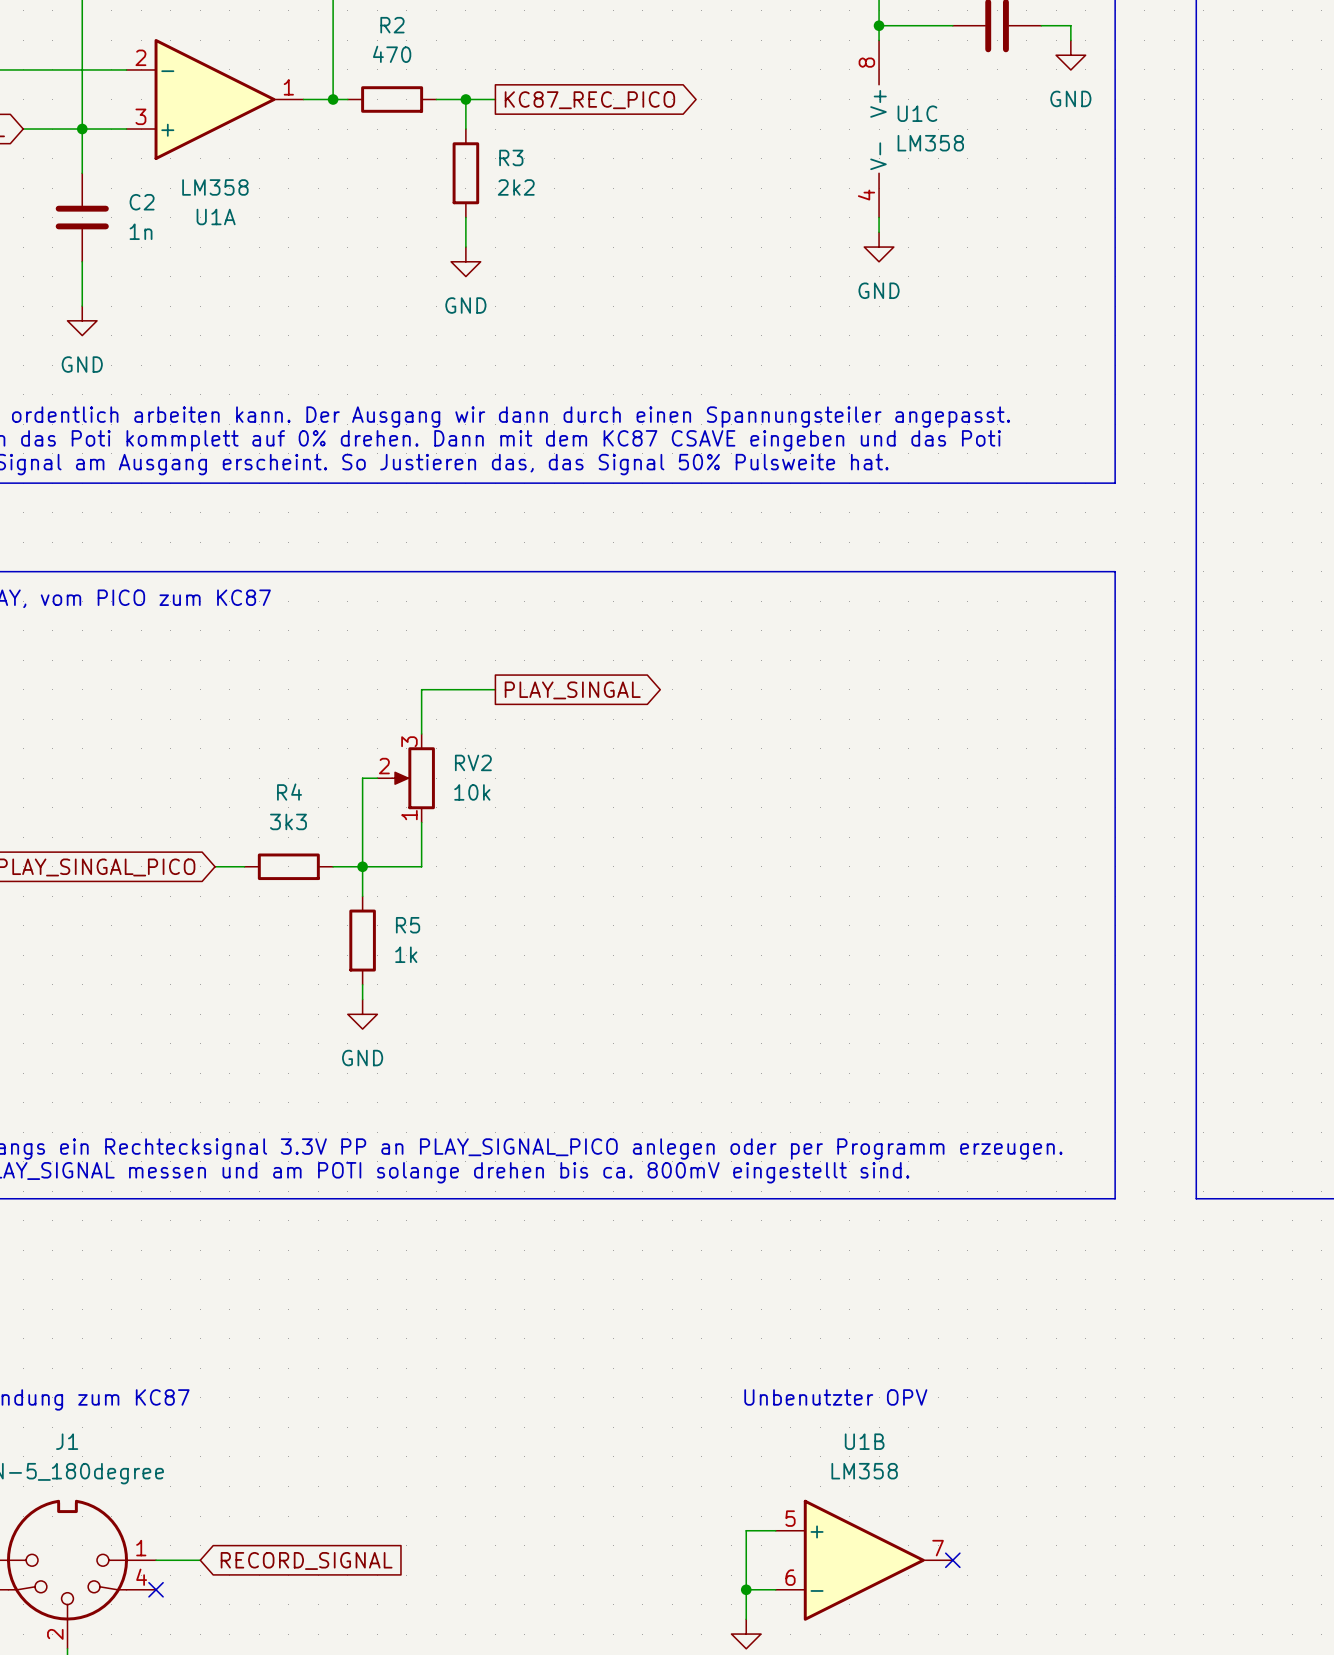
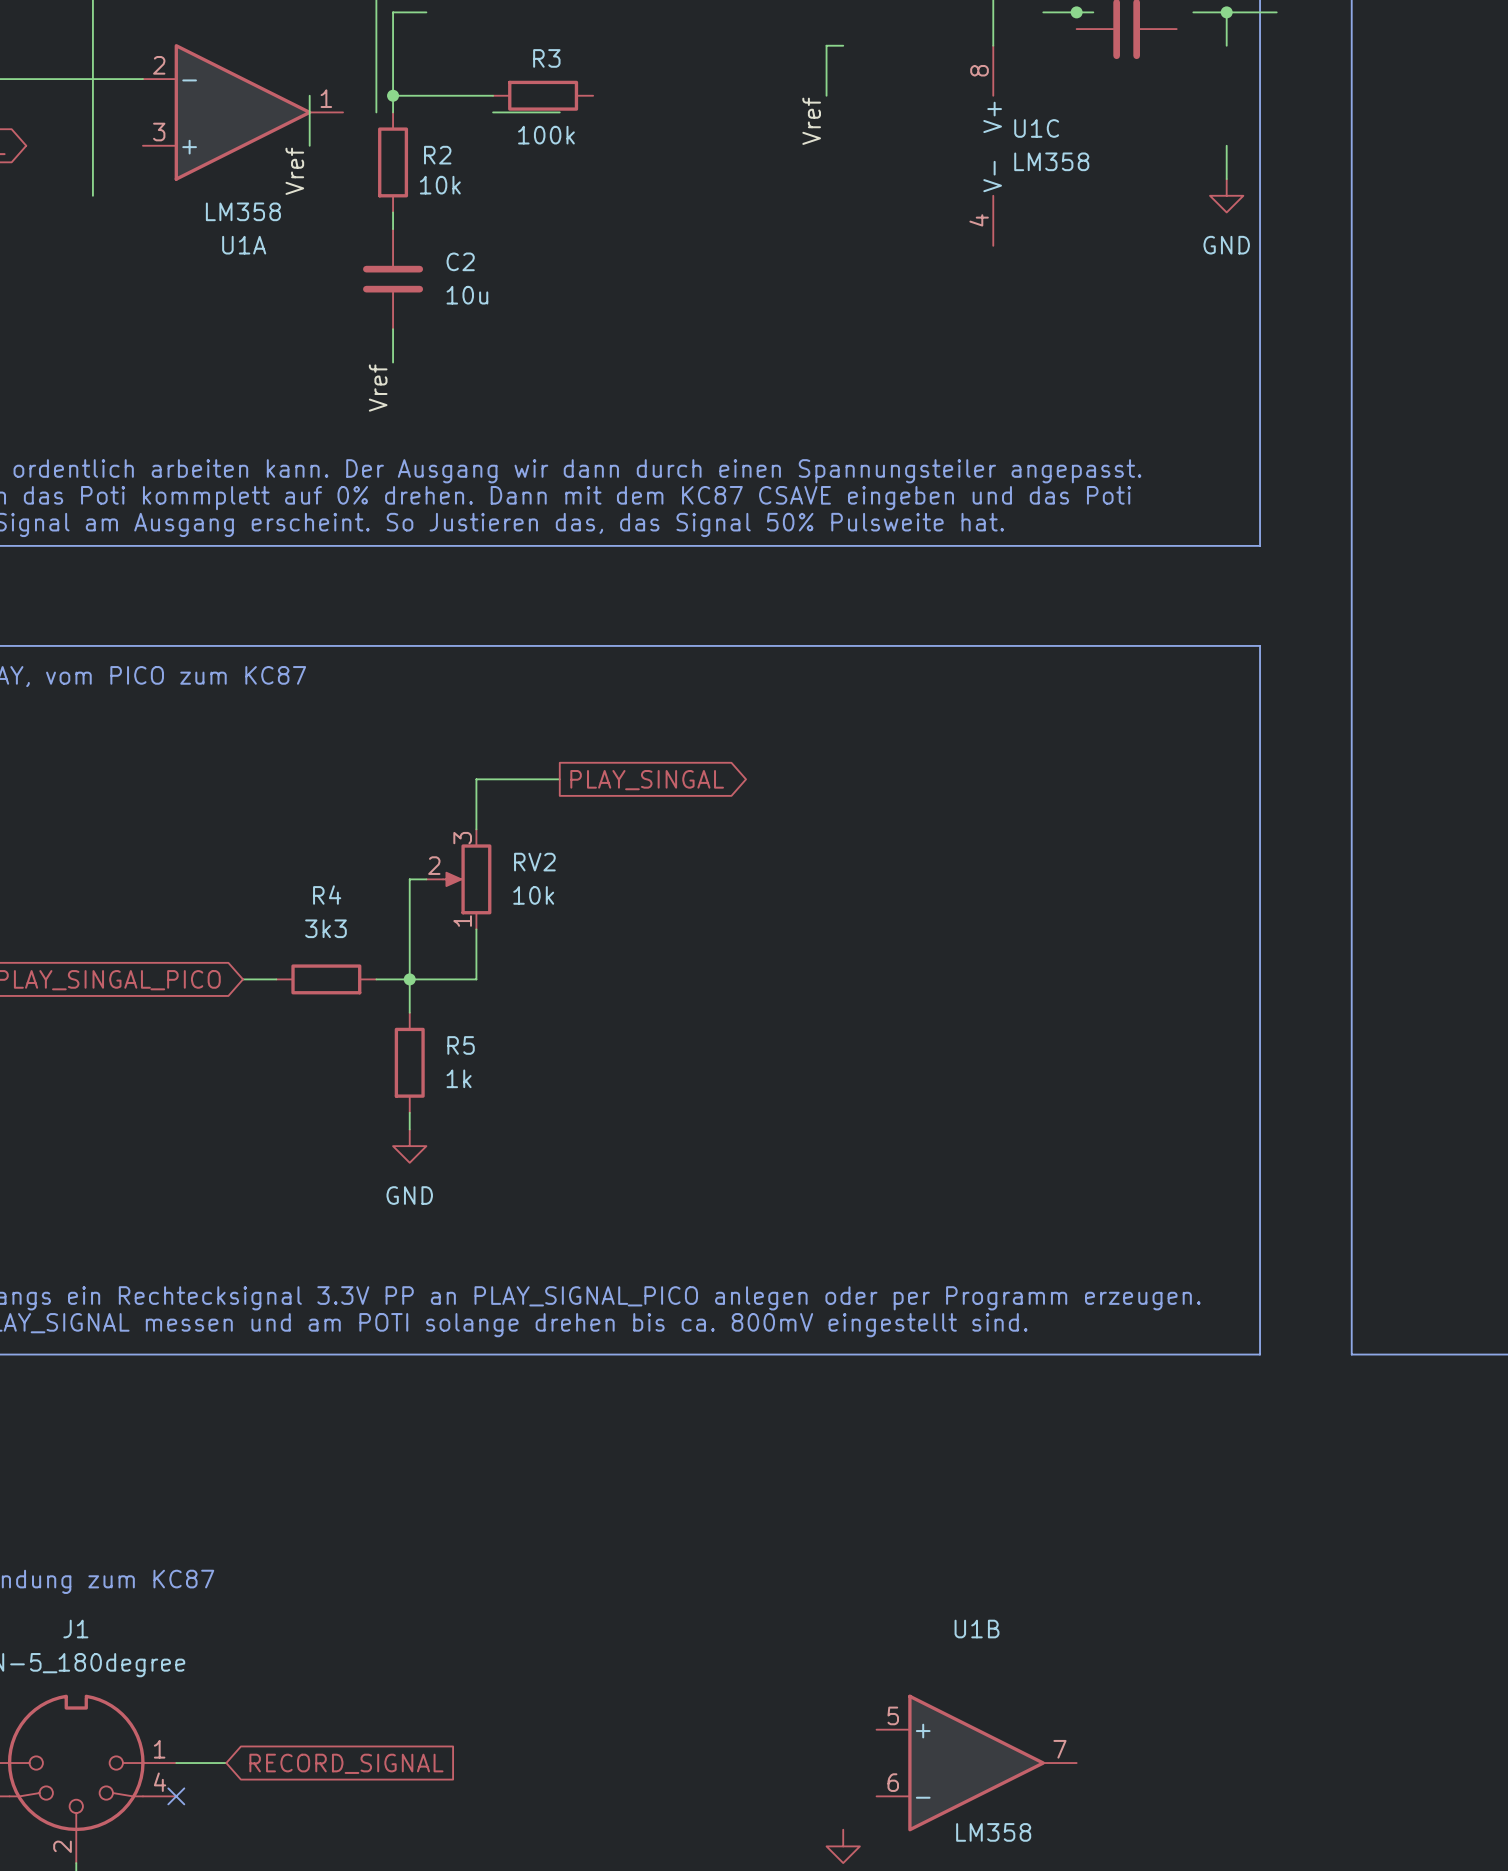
wire: none -> (1043, 12) (1093, 12)
junction: none -> (1076, 12)
wire: none -> (1226, 12) (1226, 45)
junction: none -> (1226, 12)
R2 name position: R2 (392, 25) -> R2 (437, 155)
wire: (879, 25) (952, 25) -> (1193, 12) (1276, 12)
junction: (879, 25) -> none
wire: (1041, 25) (1070, 25) (1070, 40) -> none
wire: none -> (843, 45) (826, 45) (826, 95)
R2 value: 470 (392, 54) -> 10k (440, 185)
power symbol: GND (1070, 55) -> none
wire: none -> (393, 95) (493, 95)
wire: (303, 99) (347, 99) -> (426, 12) (393, 12) (393, 112)
junction position: (333, 99) -> (393, 95)
R2 rotation: 0° (392, 99) -> 90° clockwise (393, 162)
R2 position: (392, 99) -> (393, 162)
wire: (465, 99) (465, 129) -> none
junction: (465, 99) -> none
global label: KC87_REC_PICO (589, 100) -> none
label: none -> Vref (811, 121)
wire: (23, 129) (126, 129) -> none
junction: (82, 129) -> none
wire: none -> (1226, 145) (1226, 179)
label: none -> Vref (294, 171)
R3 name position: R3 (511, 157) -> R3 (546, 58)
R3 rotation: 0° (465, 173) -> 90° clockwise (543, 95)
R3 position: (465, 173) -> (543, 95)
power symbol: none -> GND (1226, 195)
R3 value: 2k2 (516, 187) -> 100k (546, 135)
wire: none -> (393, 212) (393, 229)
C2 position: (82, 217) -> (393, 279)
wire: (465, 217) (465, 247) -> (393, 329) (393, 362)
wire: (879, 217) (879, 232) -> none
C2 value: 1n (141, 231) -> 10u (467, 295)
power symbol: GND (879, 247) -> none
wire: (82, 261) (82, 306) -> (309, 95) (309, 145)
power symbol: GND (465, 261) -> none
power symbol: GND (82, 320) -> none
label: none -> Vref (378, 388)
text: Unbenutzter OPV (835, 1397) -> none
U1B value position: LM358 (864, 1471) -> LM358 (993, 1832)
wire: (775, 1530) (746, 1530) (746, 1619) -> none
no-connect mark: (952, 1560) -> none
wire: (746, 1589) (775, 1589) -> none
junction: (746, 1589) -> none

